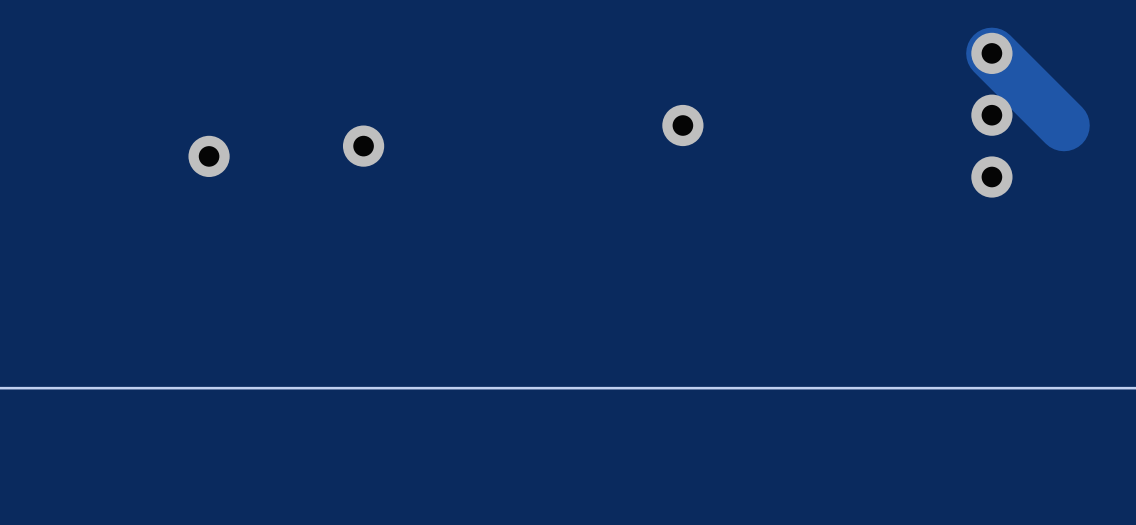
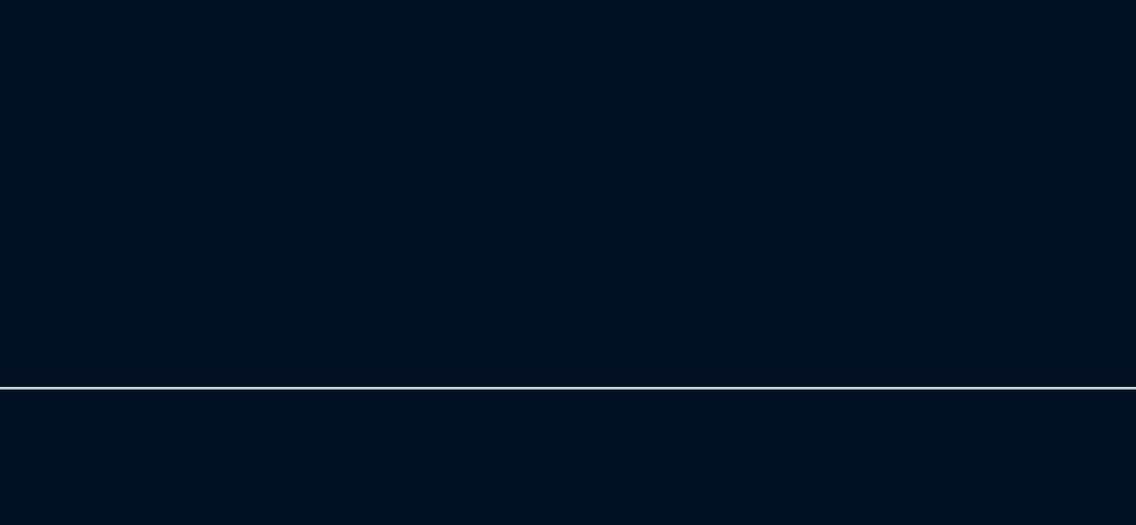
track: (991, 53) (1064, 125) -> none
via: (991, 53) -> none
via: (991, 115) -> none
via: (682, 125) -> none
via: (363, 146) -> none
via: (209, 156) -> none
via: (991, 177) -> none

